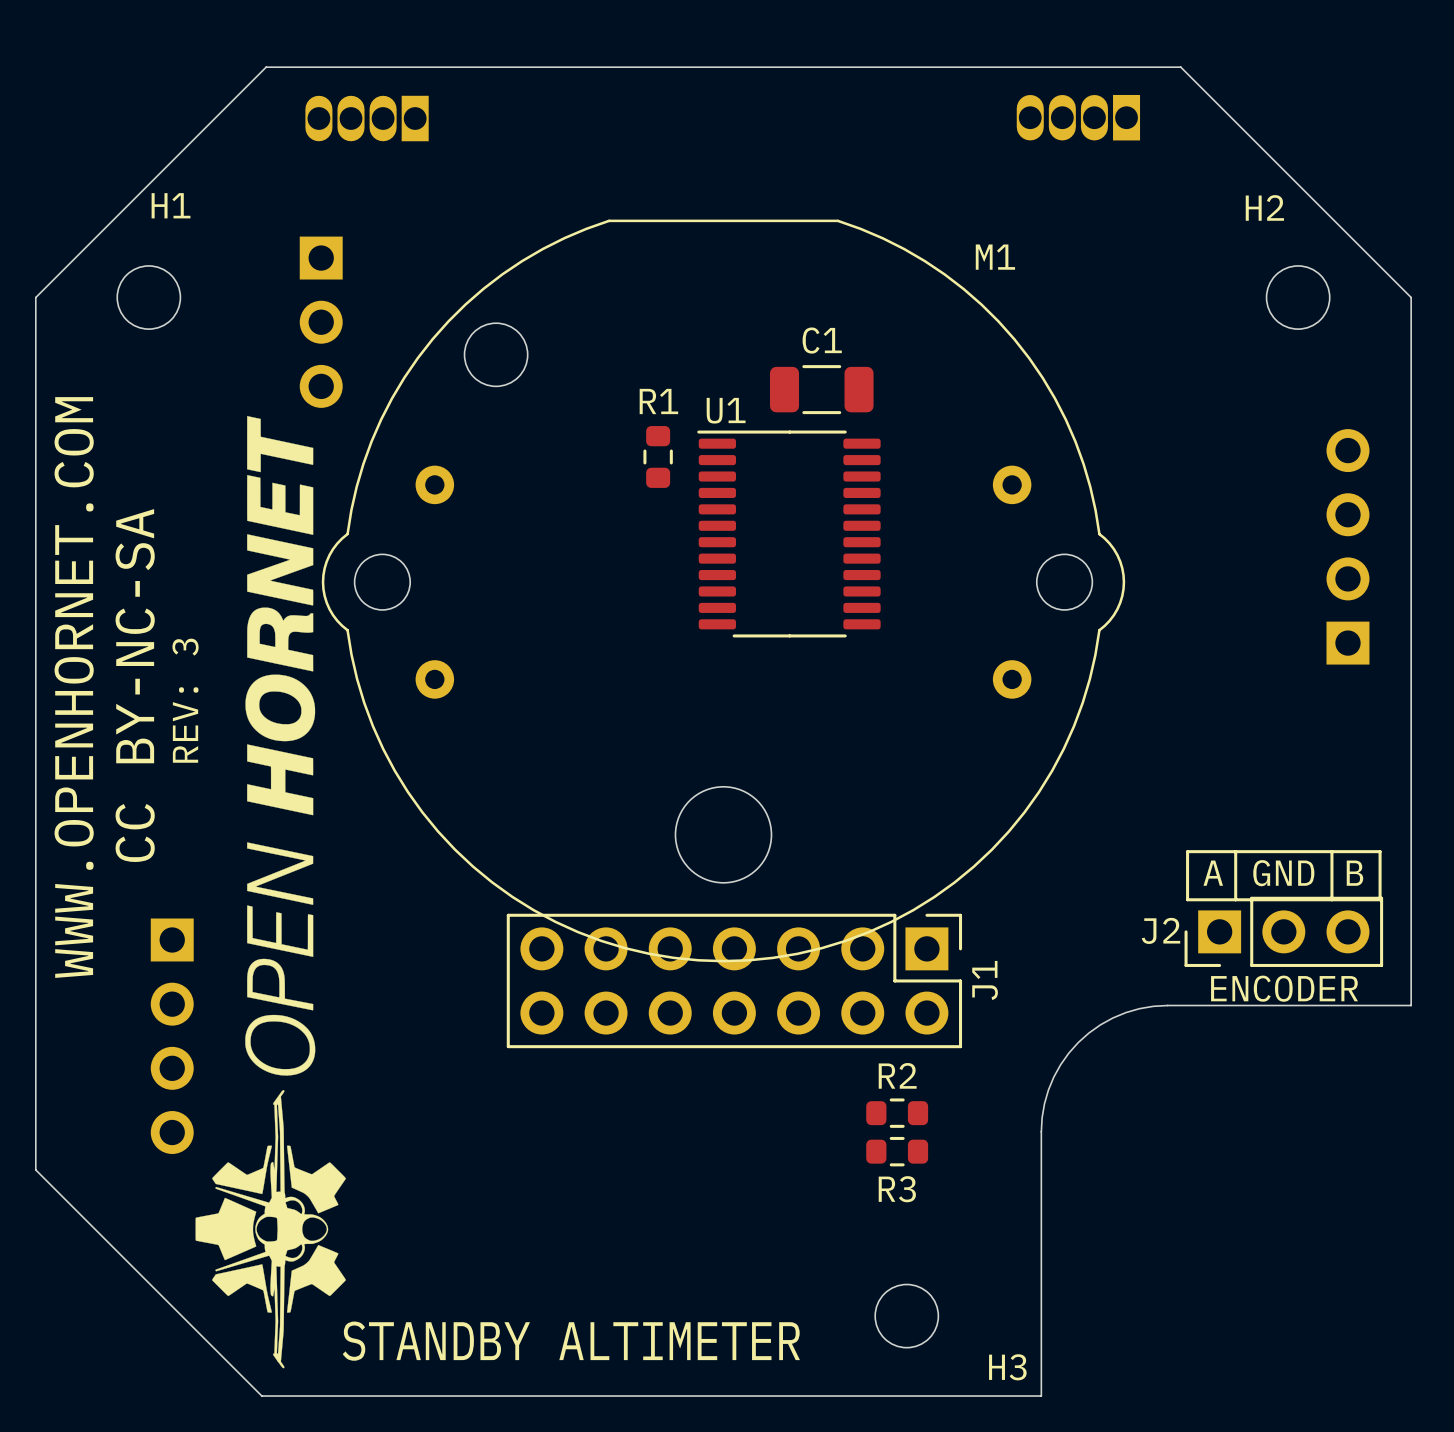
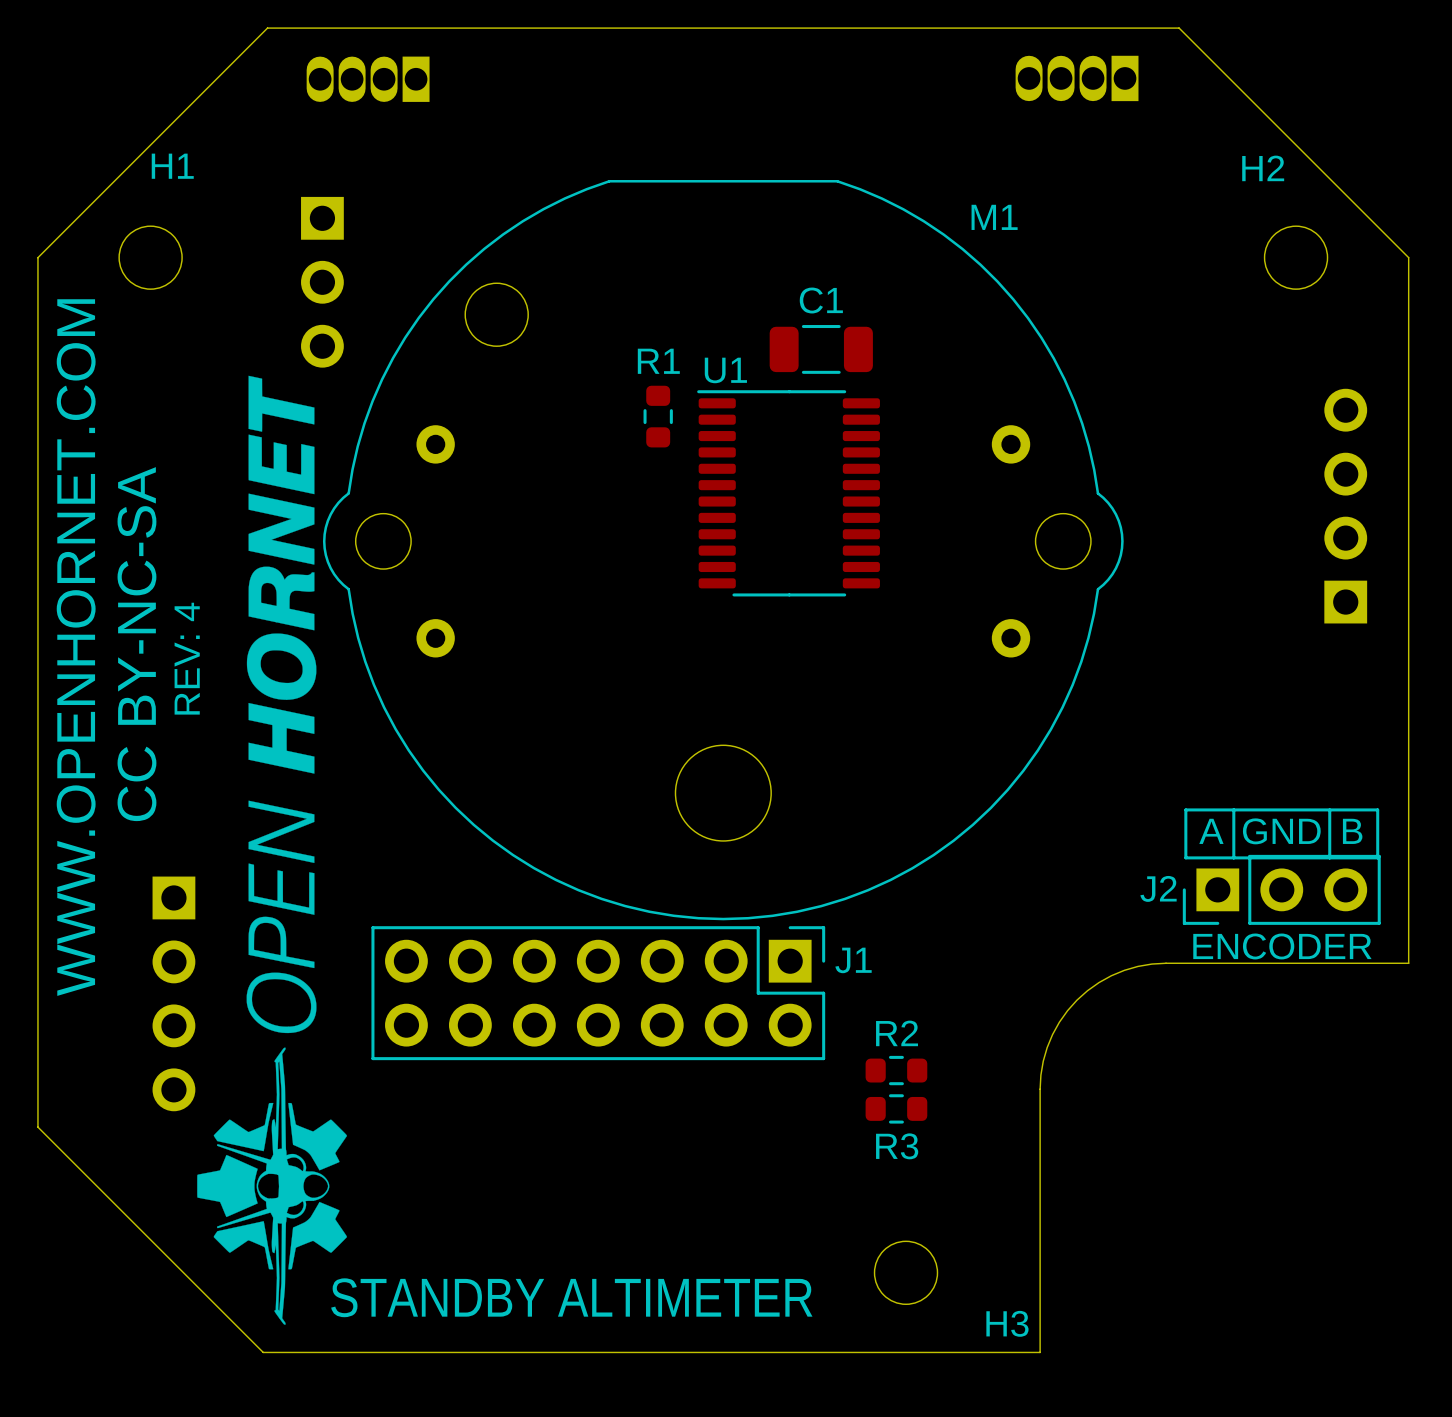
text: REV: 3 (185, 700) -> REV: 4 (187, 658)
J1 position: (734, 980) -> (598, 993)
J1 name rotation: 0° (985, 980) -> 90° clockwise (853, 960)

